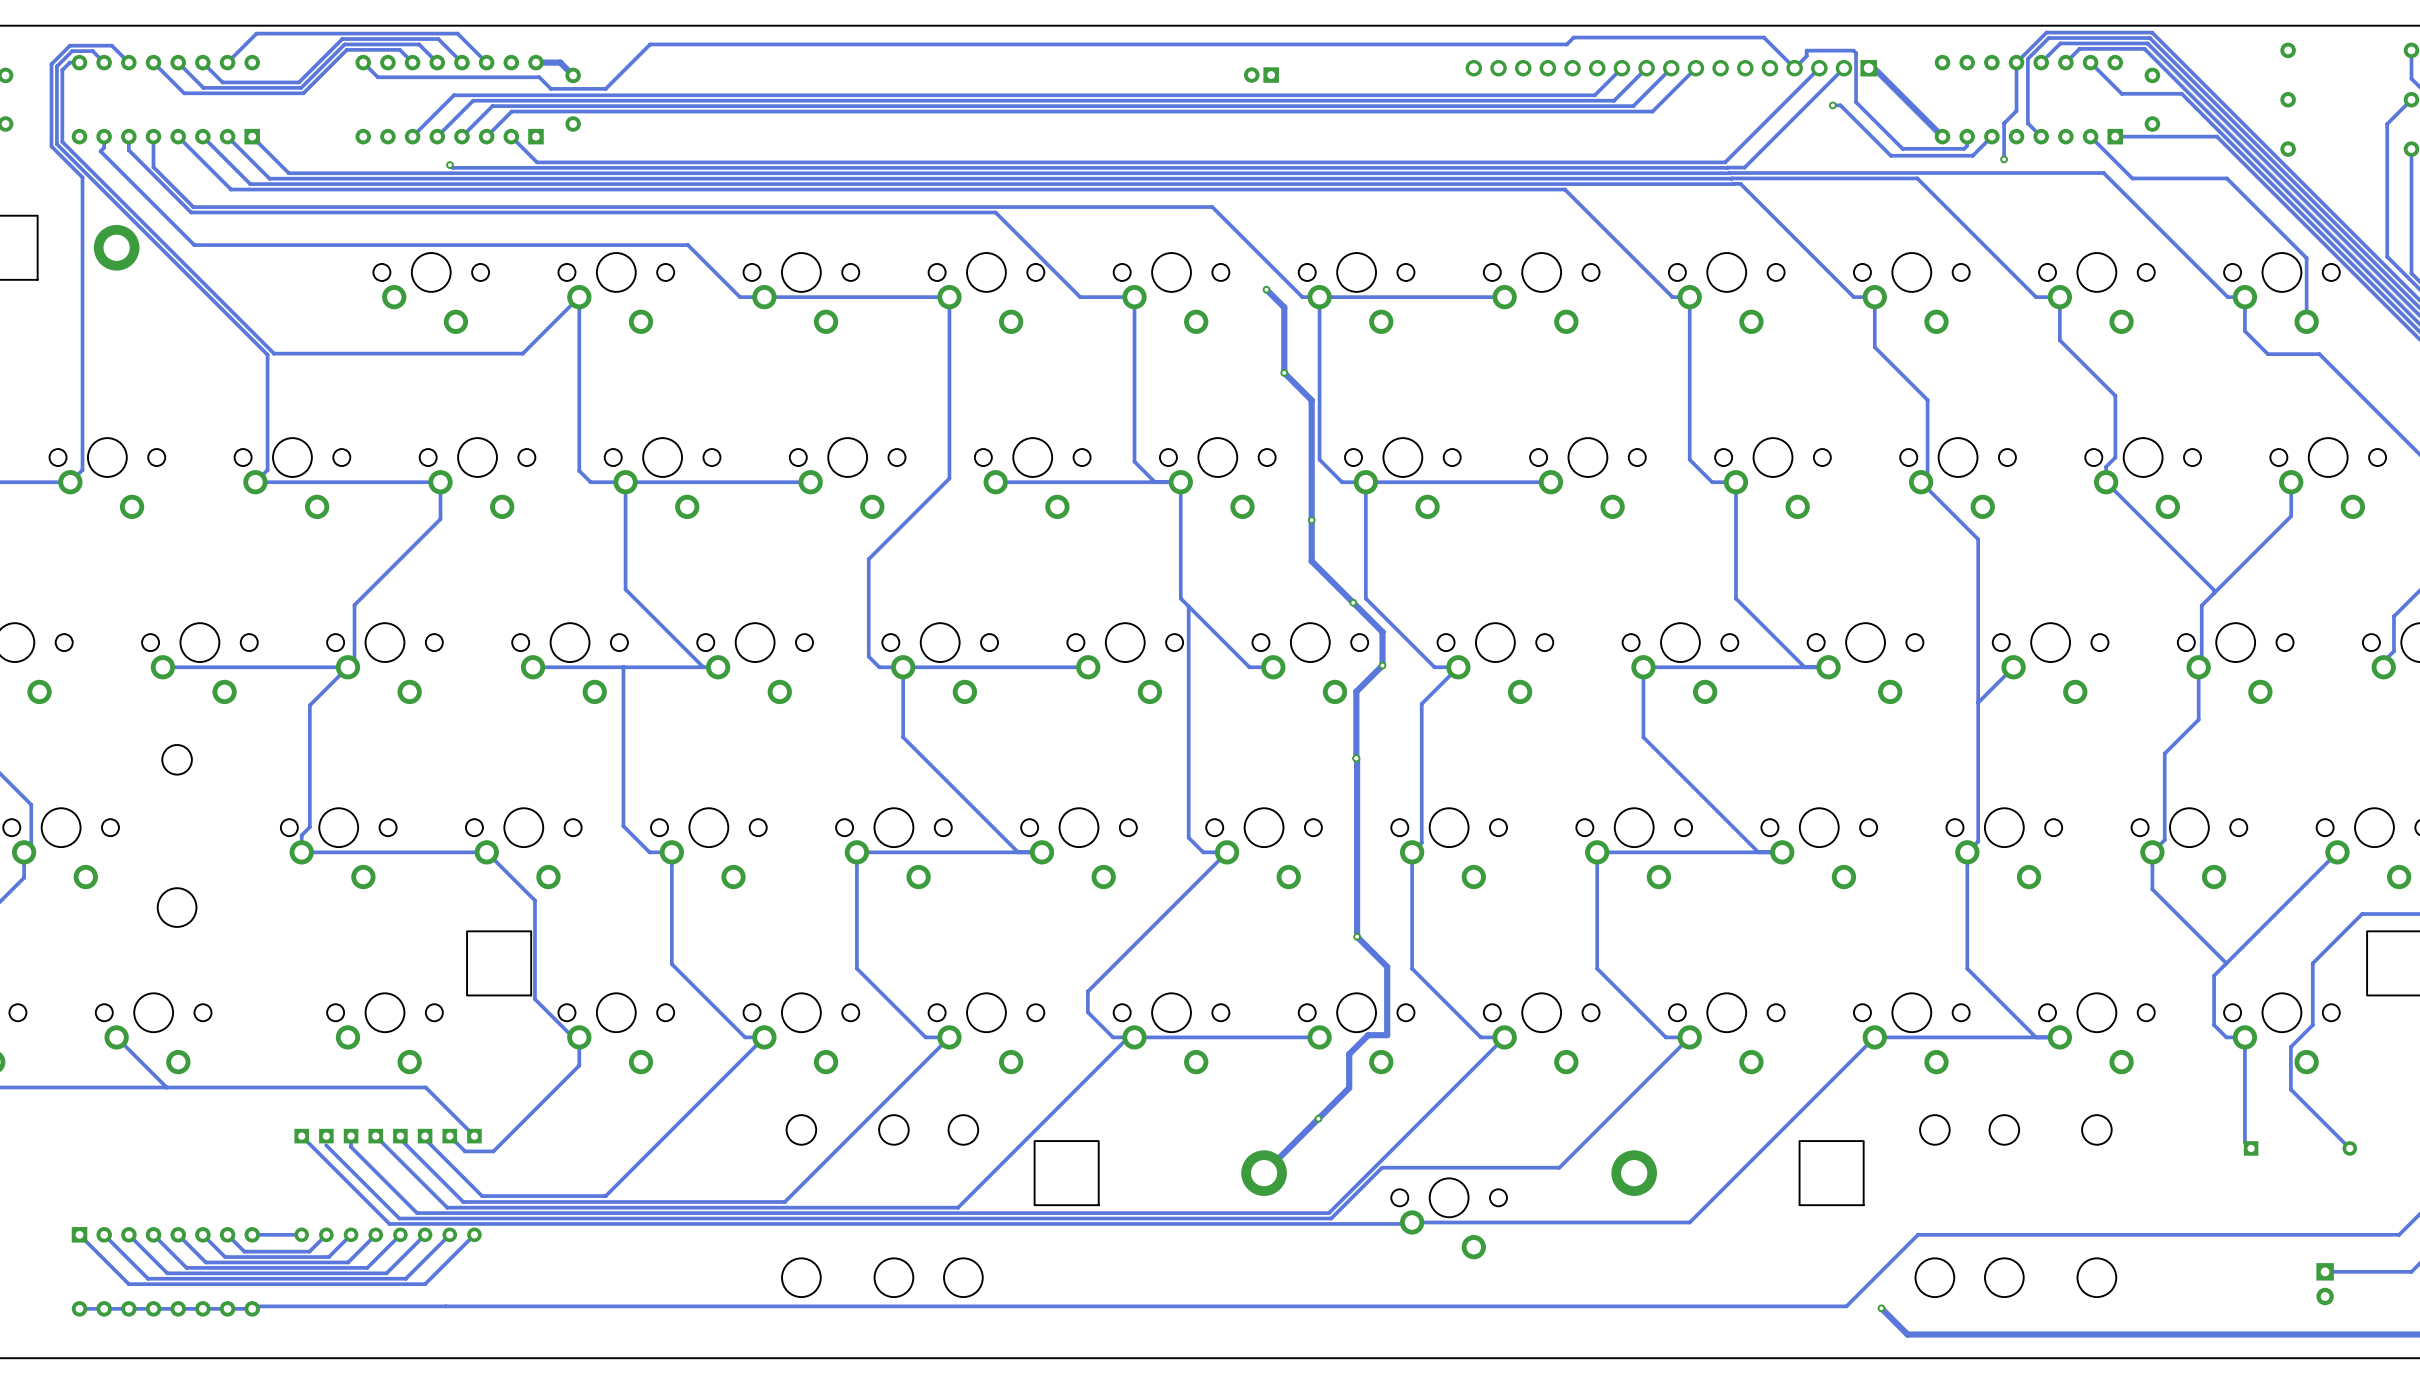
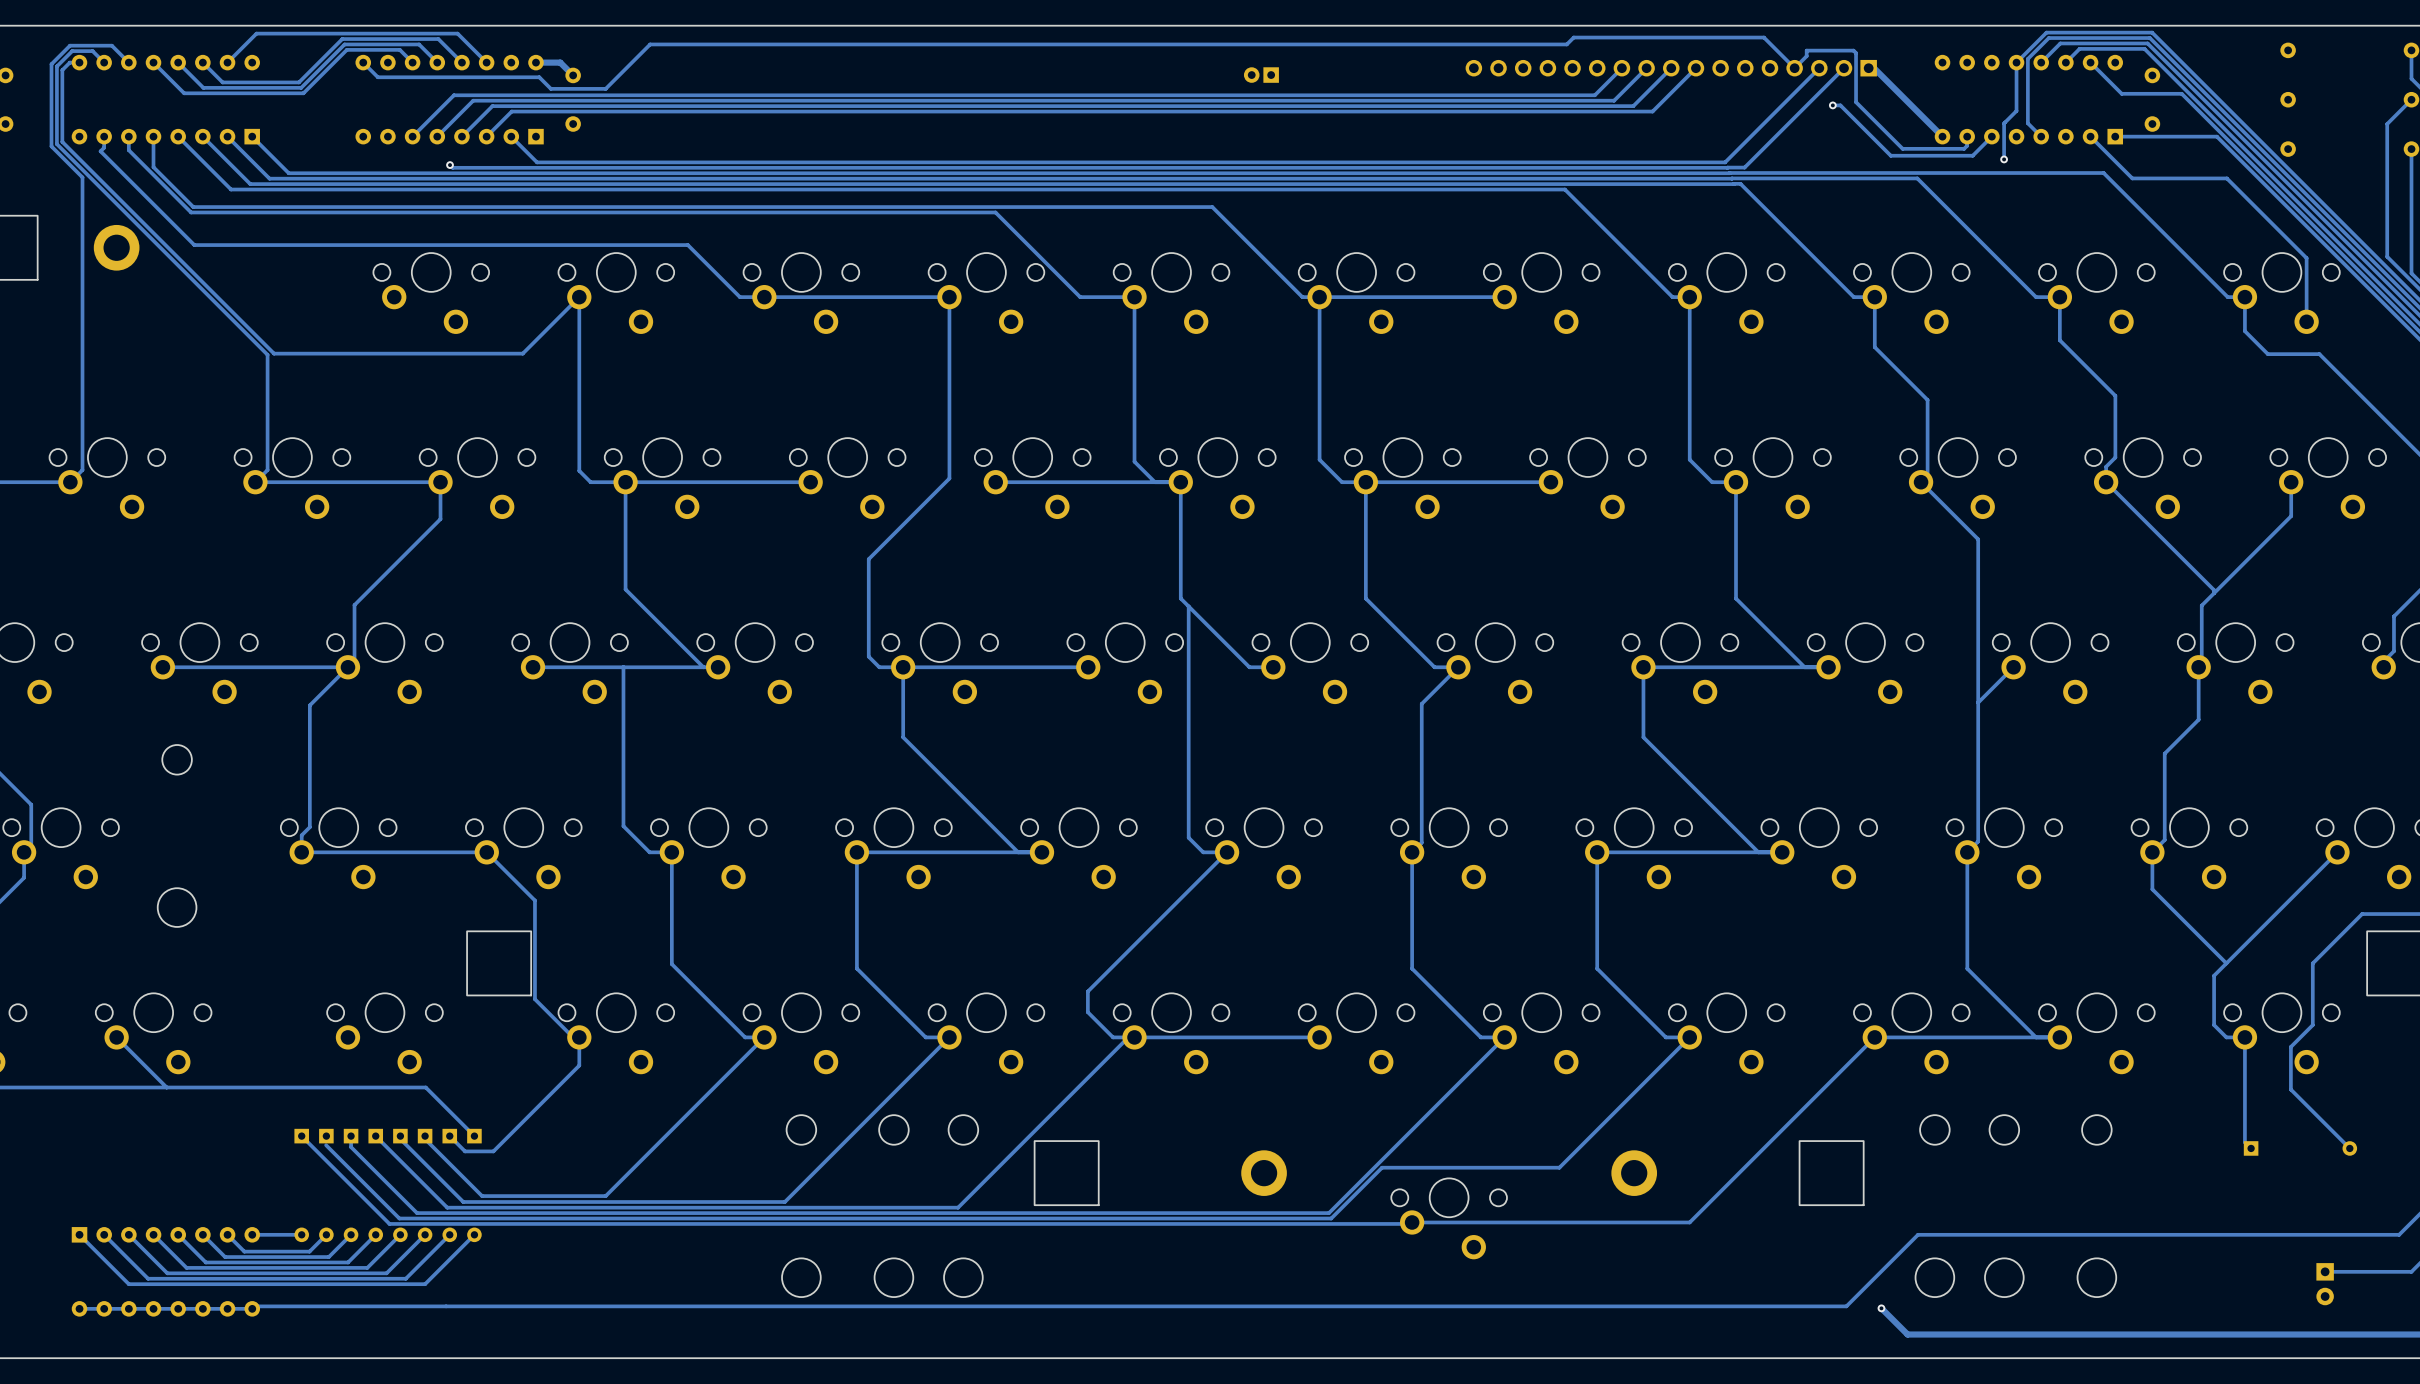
track: (1266, 289) (1284, 307) (1284, 372) (1311, 400) (1311, 561) (1382, 631) (1382, 665) (1356, 691) (1357, 936) (1387, 966) (1387, 1035) (1368, 1035) (1349, 1054) (1349, 1088) (1264, 1173) -> none
via: (1266, 289) -> none
via: (1284, 372) -> none
via: (1311, 520) -> none
via: (1353, 602) -> none
via: (1382, 665) -> none
via: (1356, 758) -> none
via: (1357, 936) -> none
via: (1318, 1118) -> none

